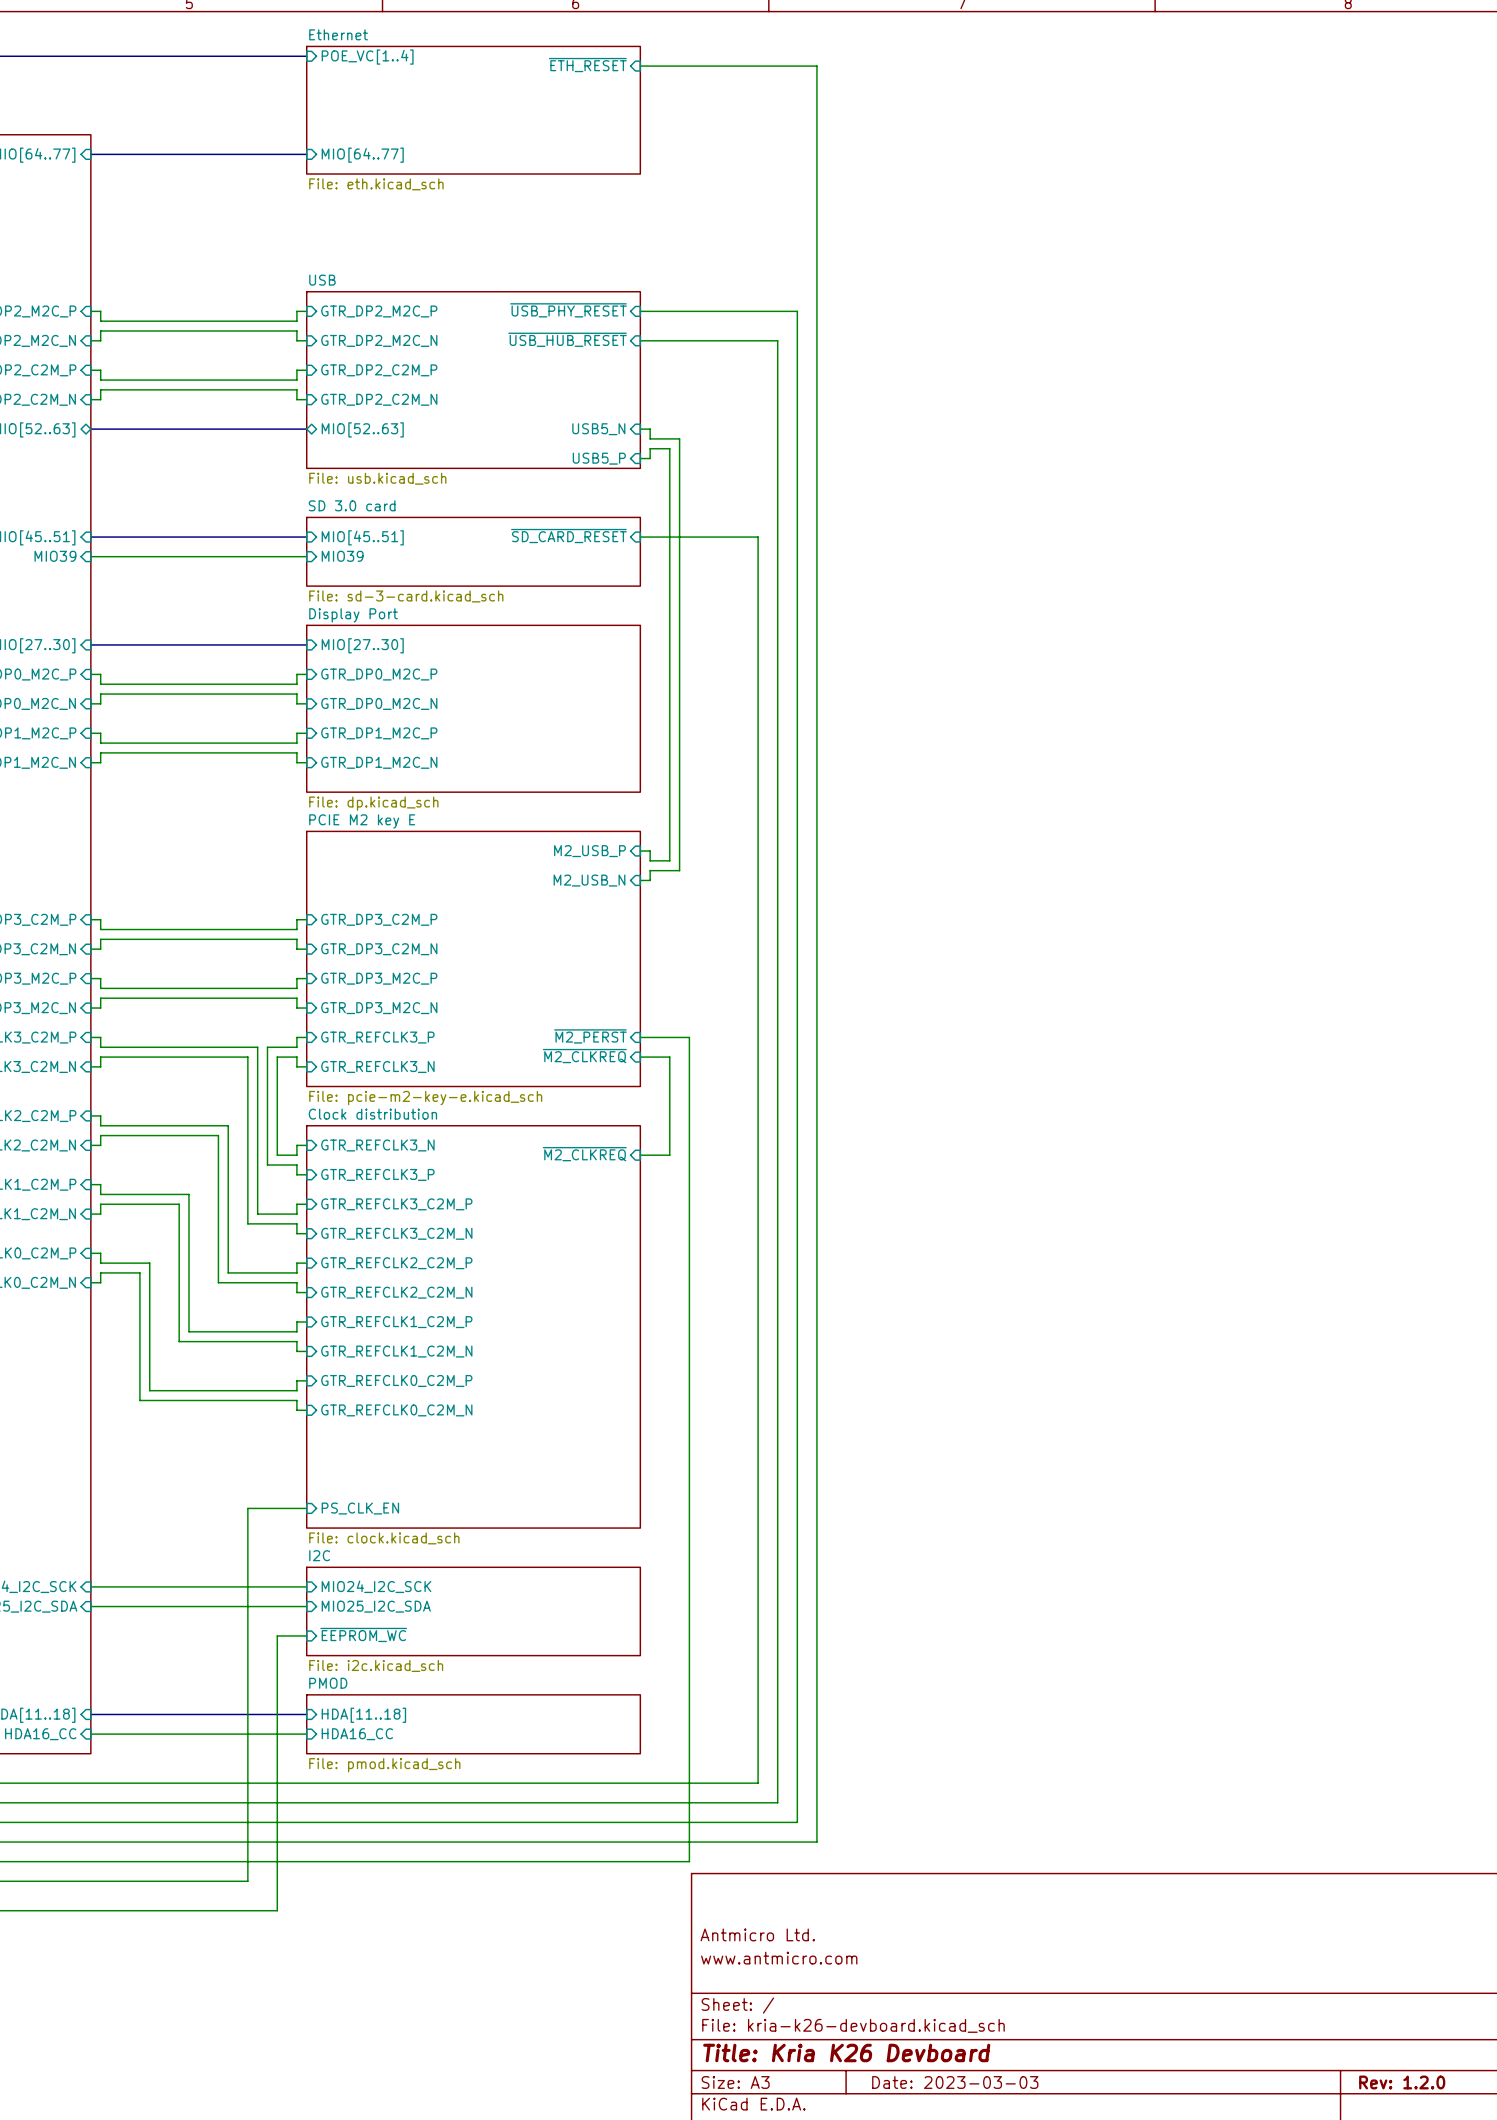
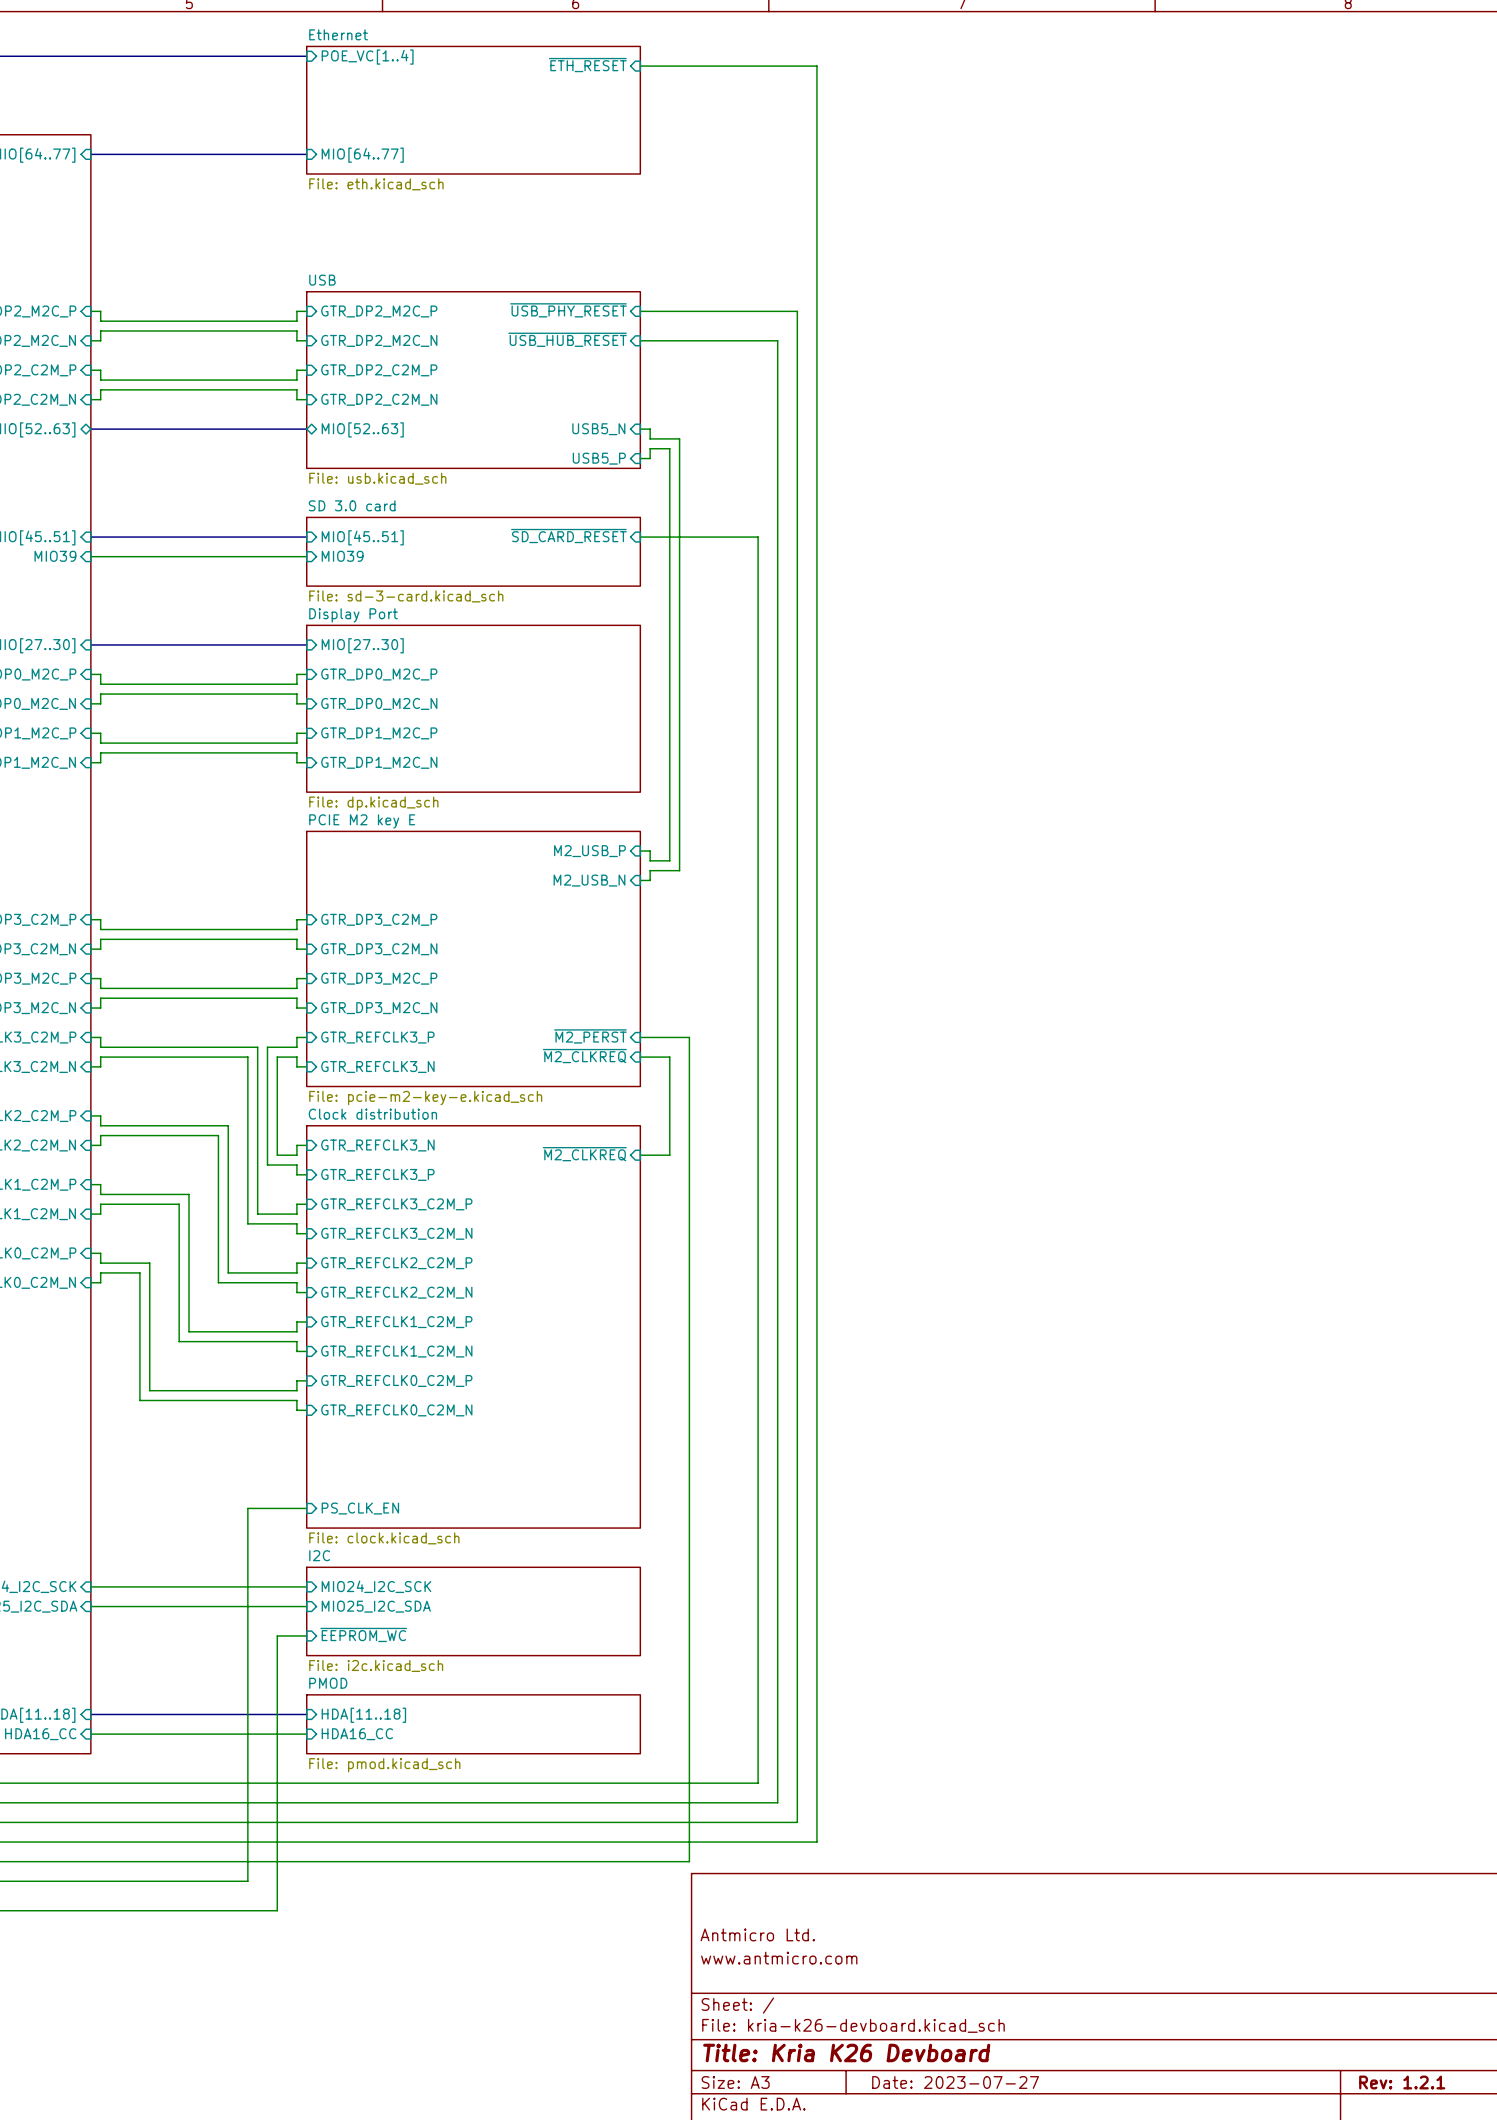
title block: Date: 2023-03-03 (955, 2082) -> Date: 2023-07-27 (955, 2082)
title block: Rev: 1.2.0 (1402, 2082) -> Rev: 1.2.1 (1402, 2082)

